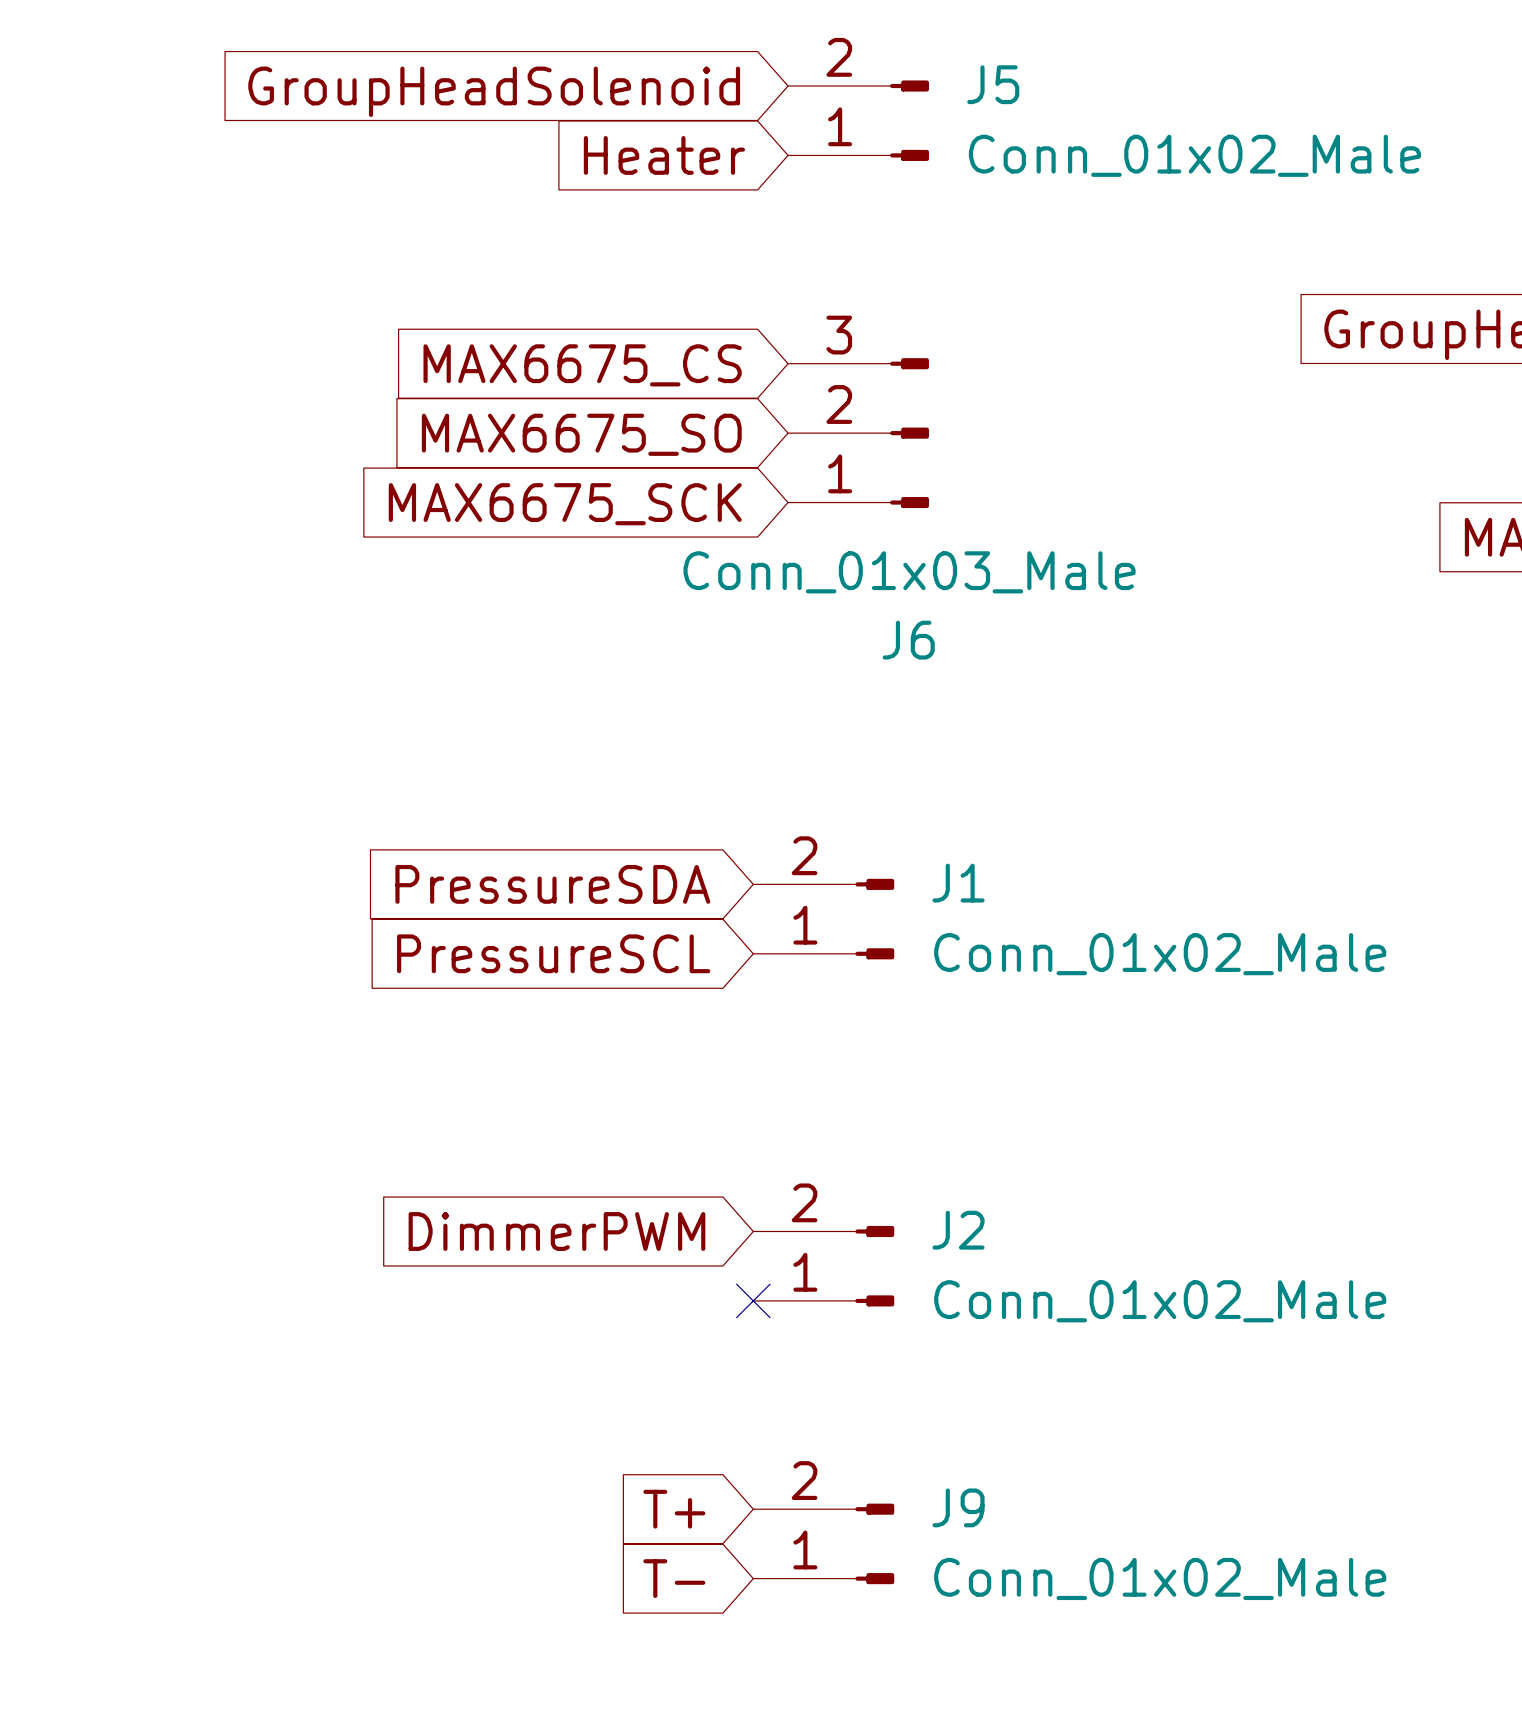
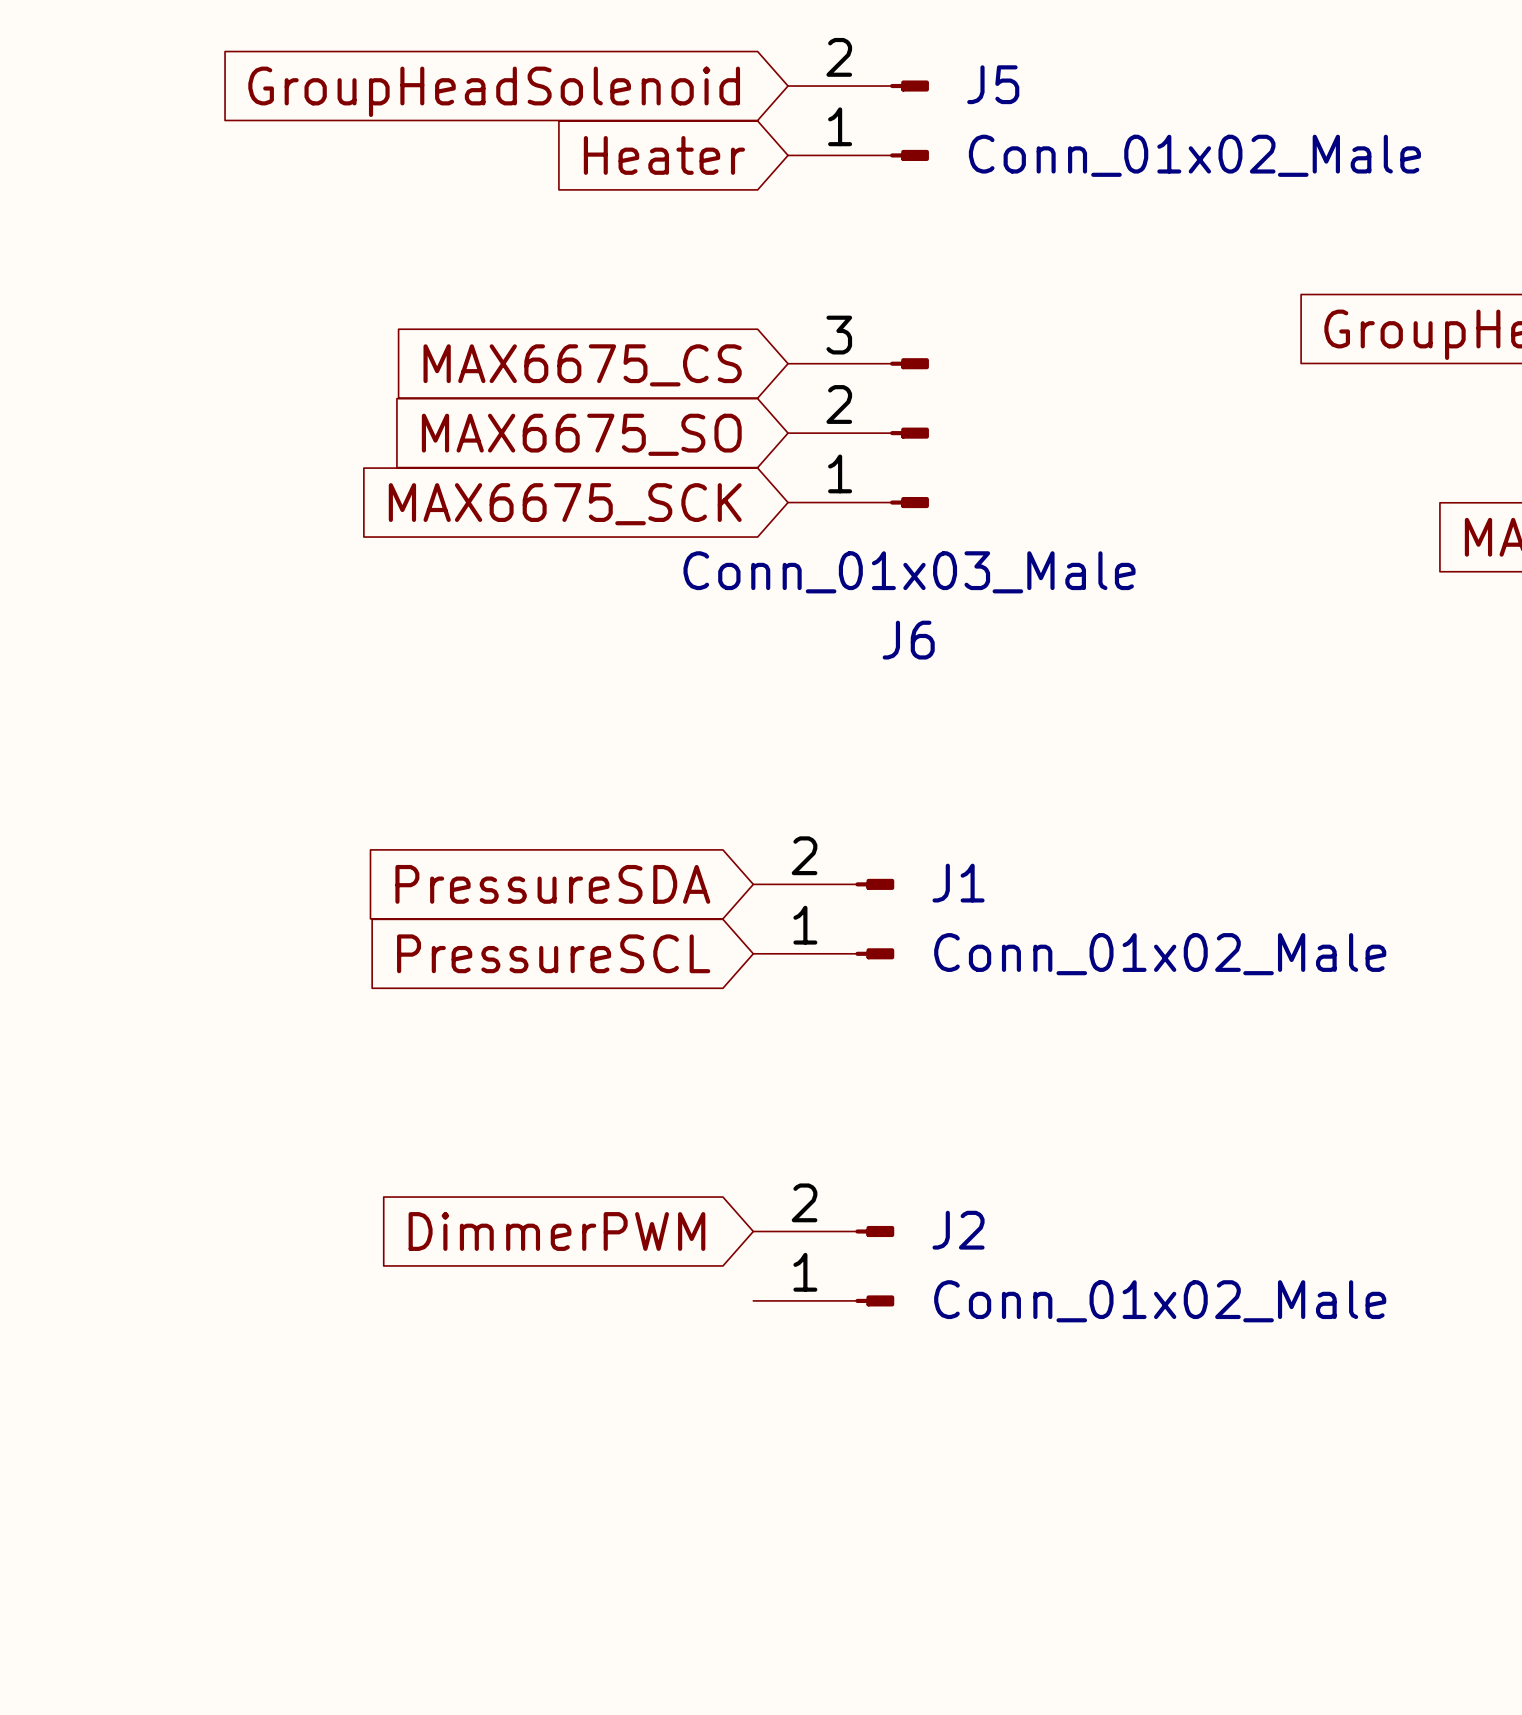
no-connect mark: (753, 1300) -> none
global label: T+ (674, 1509) -> none
J9: Conn_01x02_Male (823, 1543) -> none
global label: T- (674, 1578) -> none

